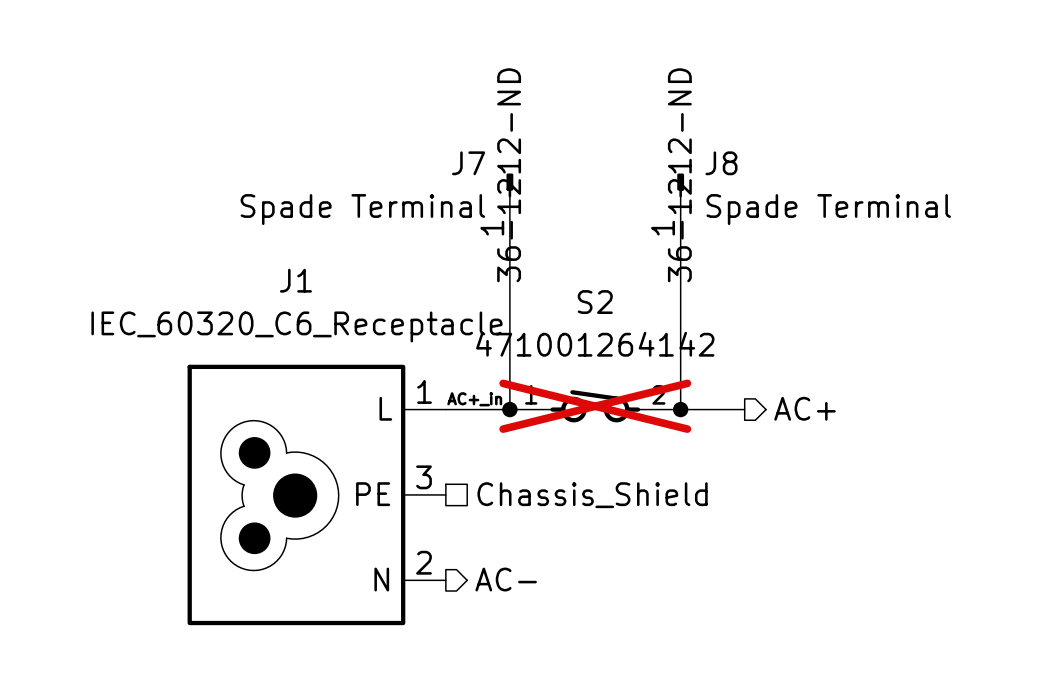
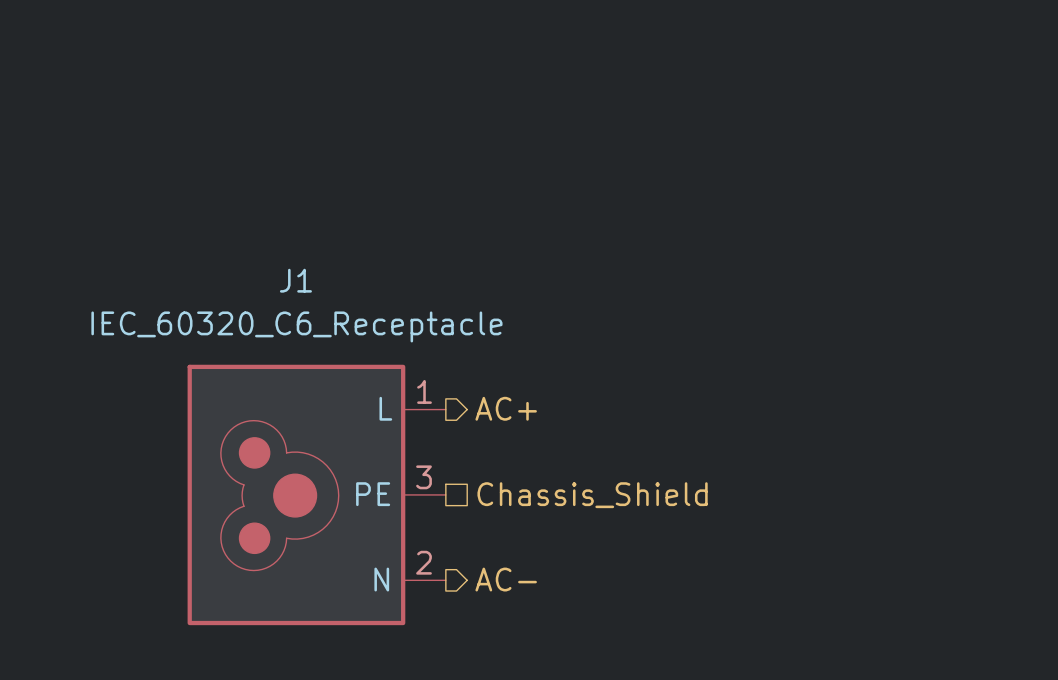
J7: Spade Terminal (509, 216) -> none
J8: Spade Terminal (680, 216) -> none
wire: (509, 260) (509, 409) (445, 409) -> none
wire: (680, 260) (680, 409) (744, 409) -> none
label: AC+_in (474, 399) -> none
S2: 471001264142 (595, 406) -> none
hierarchical label position: AC+ (804, 408) -> AC+ (506, 408)
junction: (509, 409) -> none
junction: (680, 409) -> none

